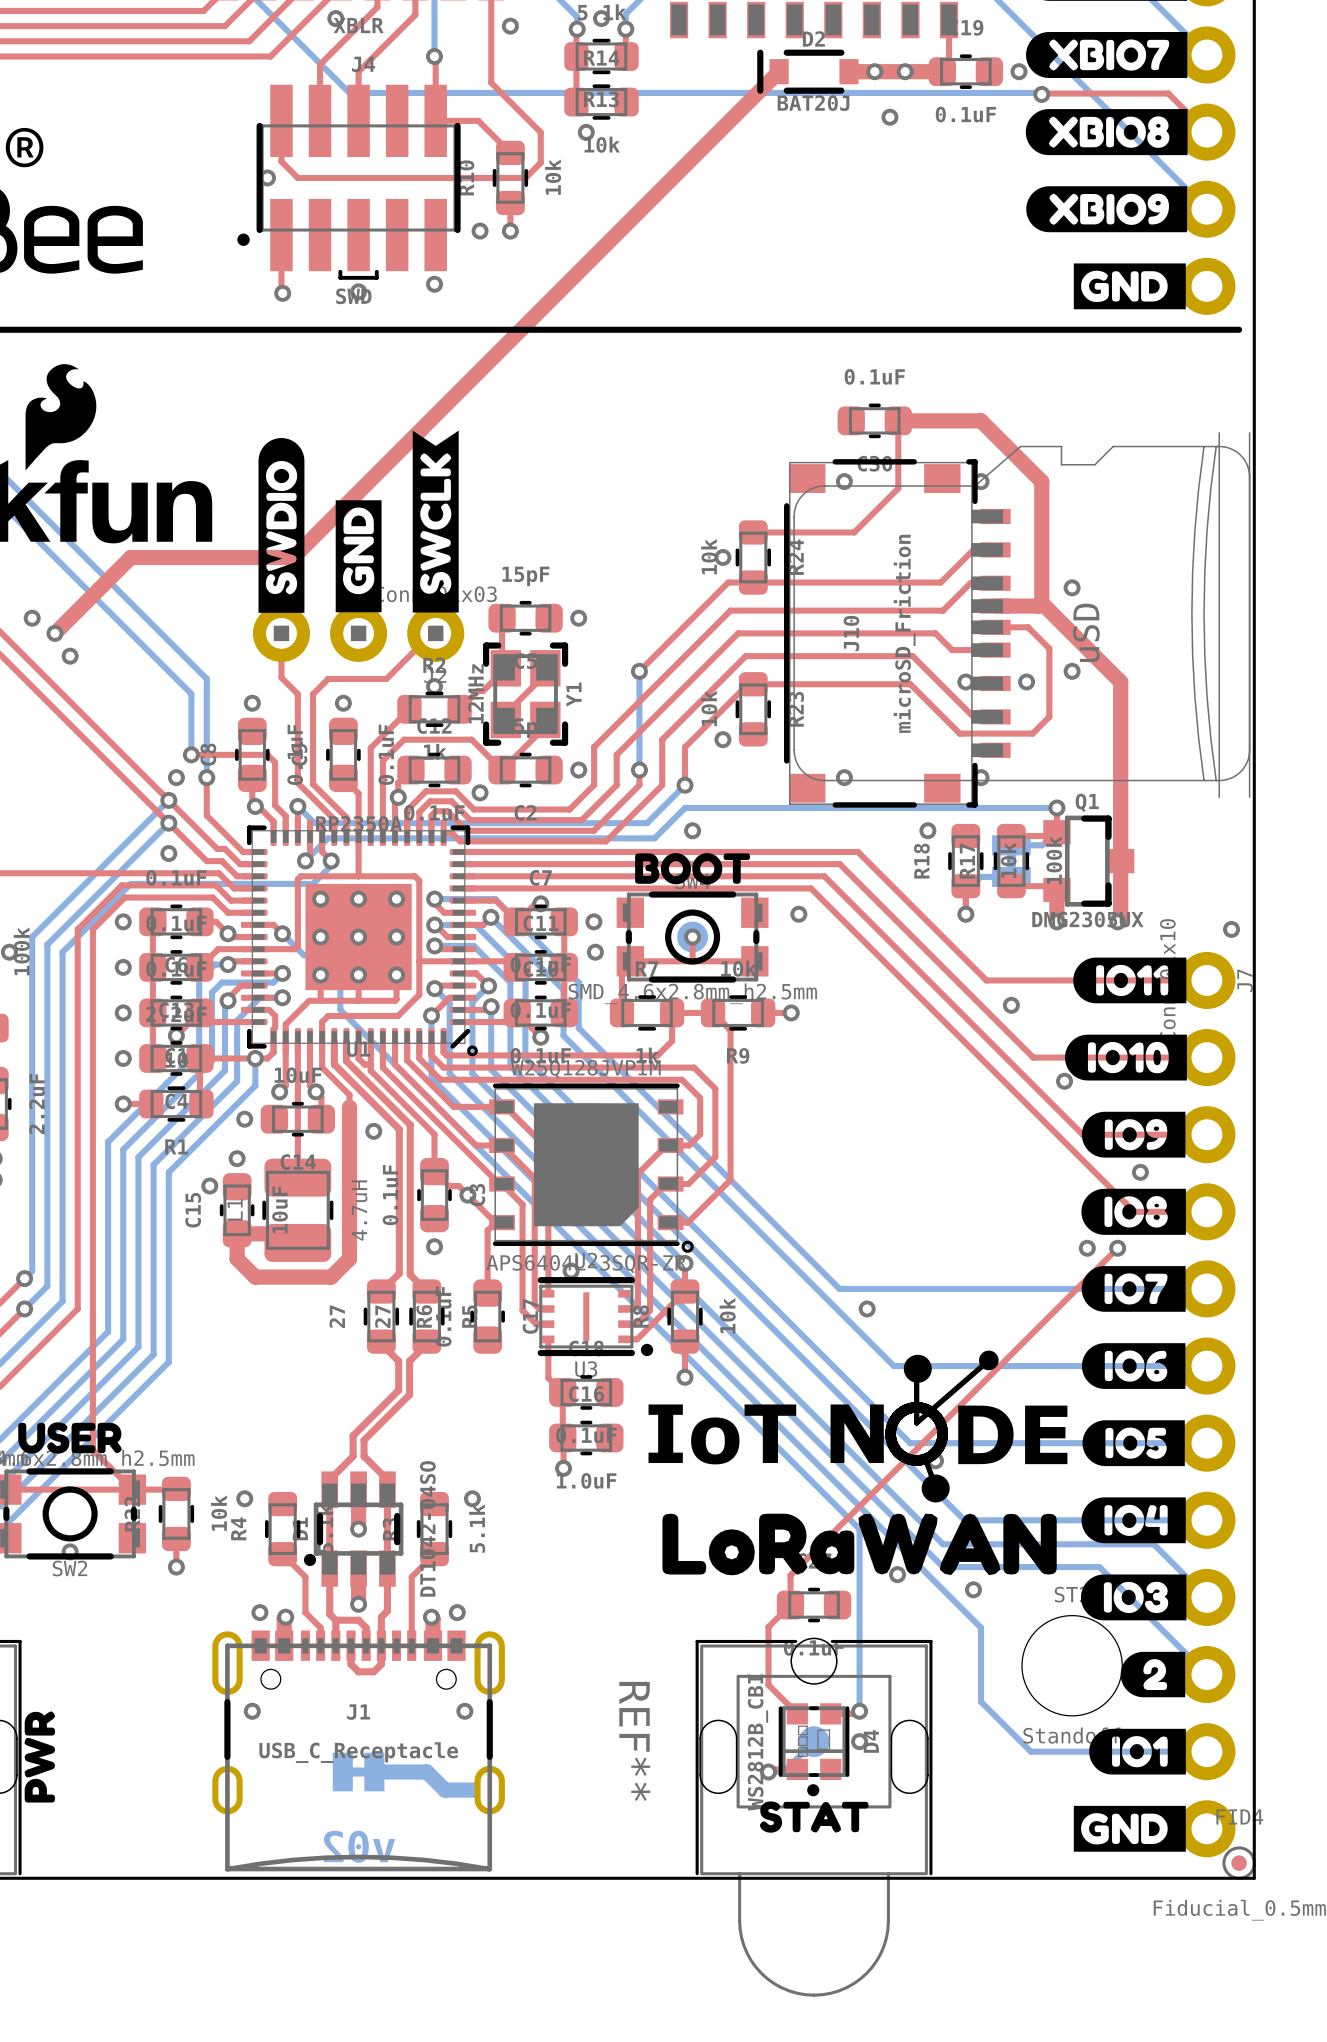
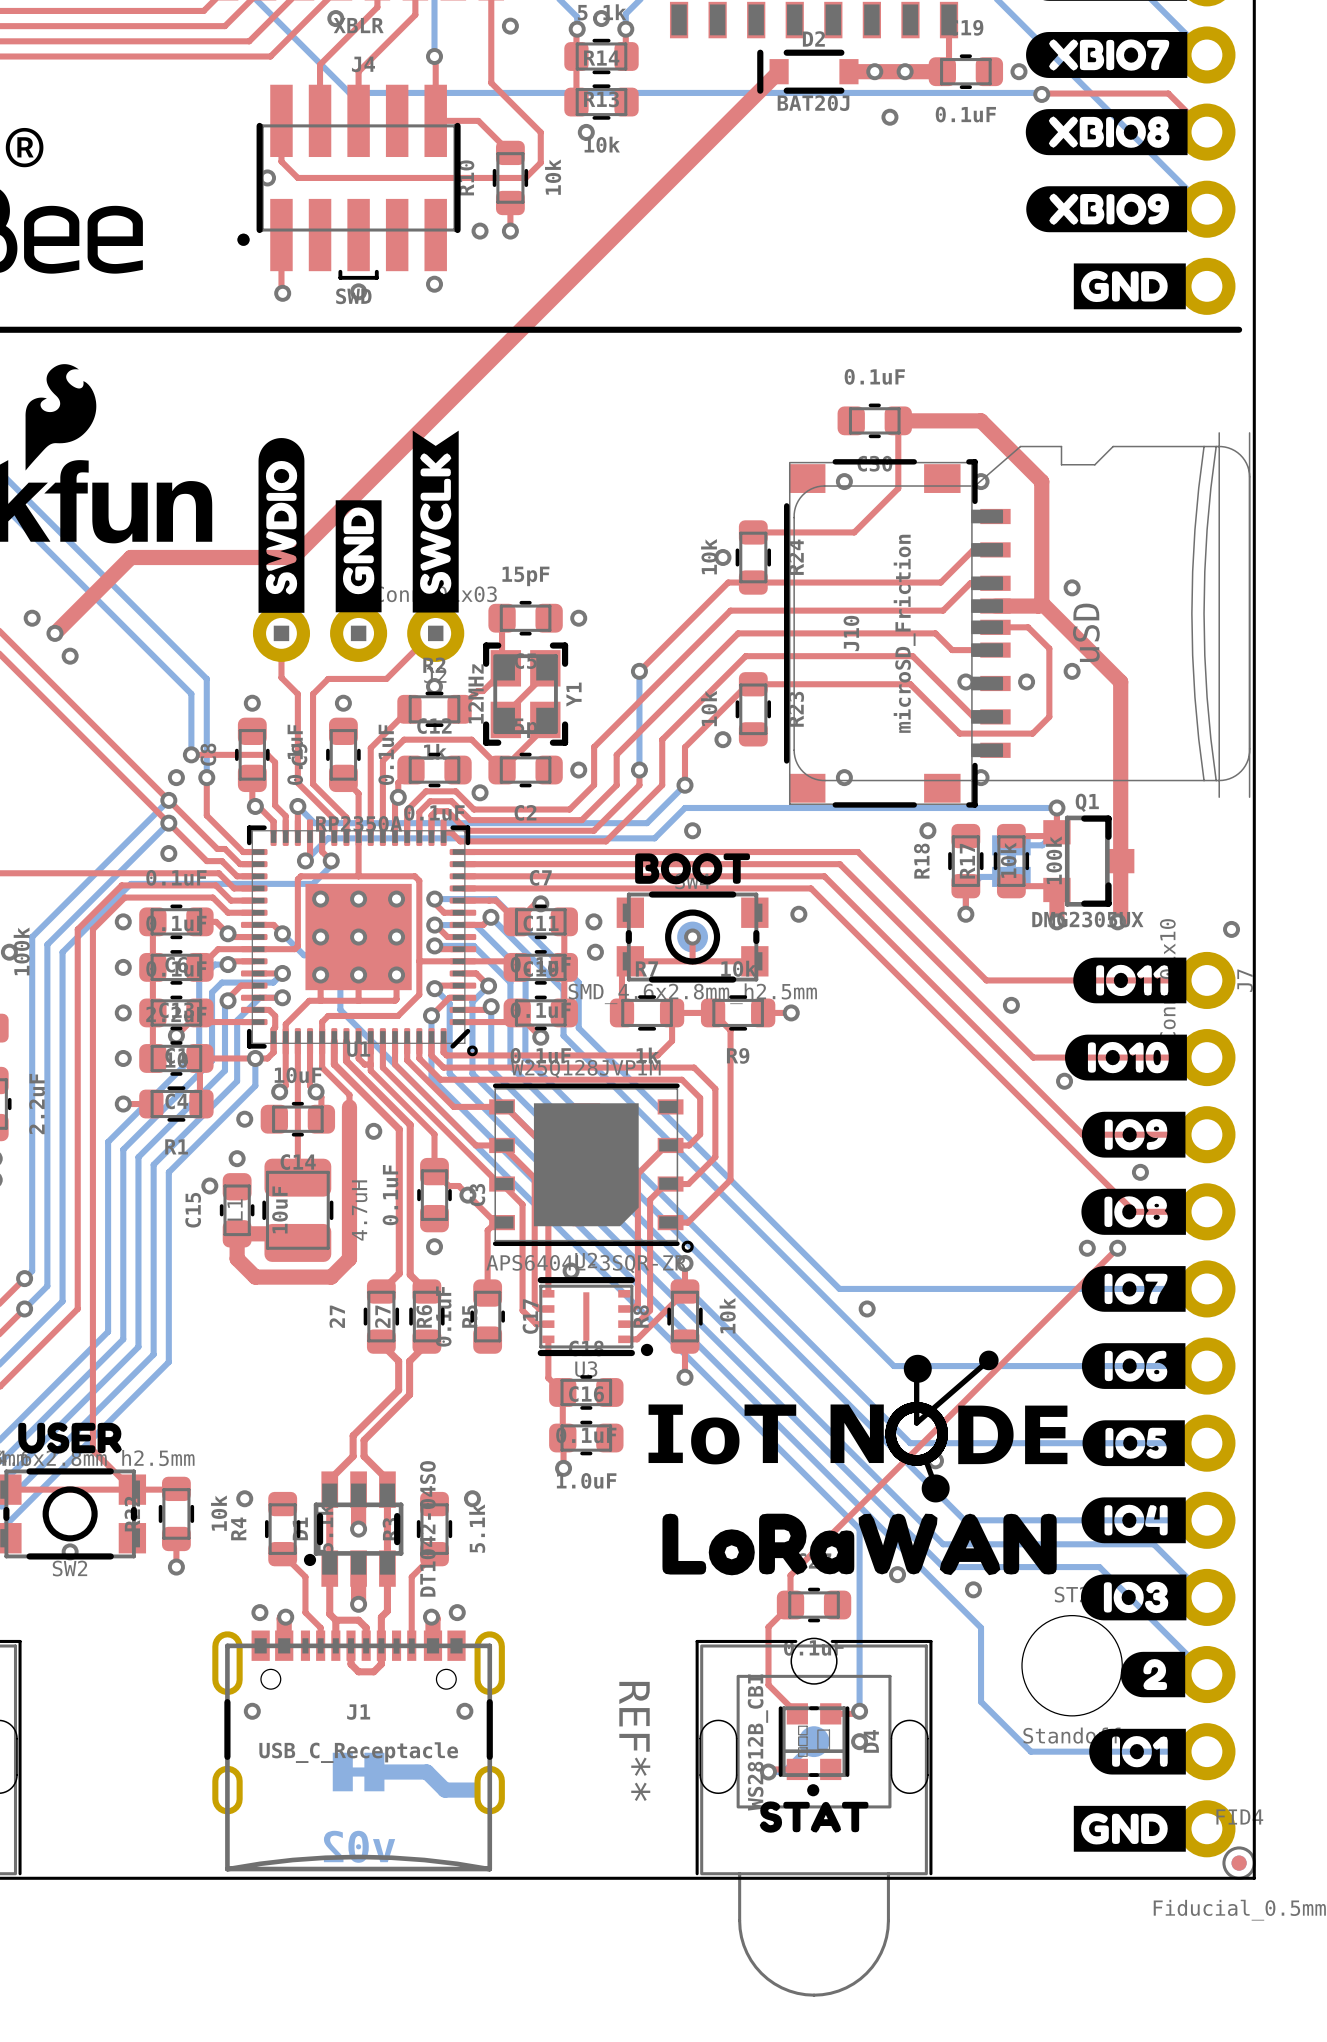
drawing: [24, 1711, 56, 1803] -> none

